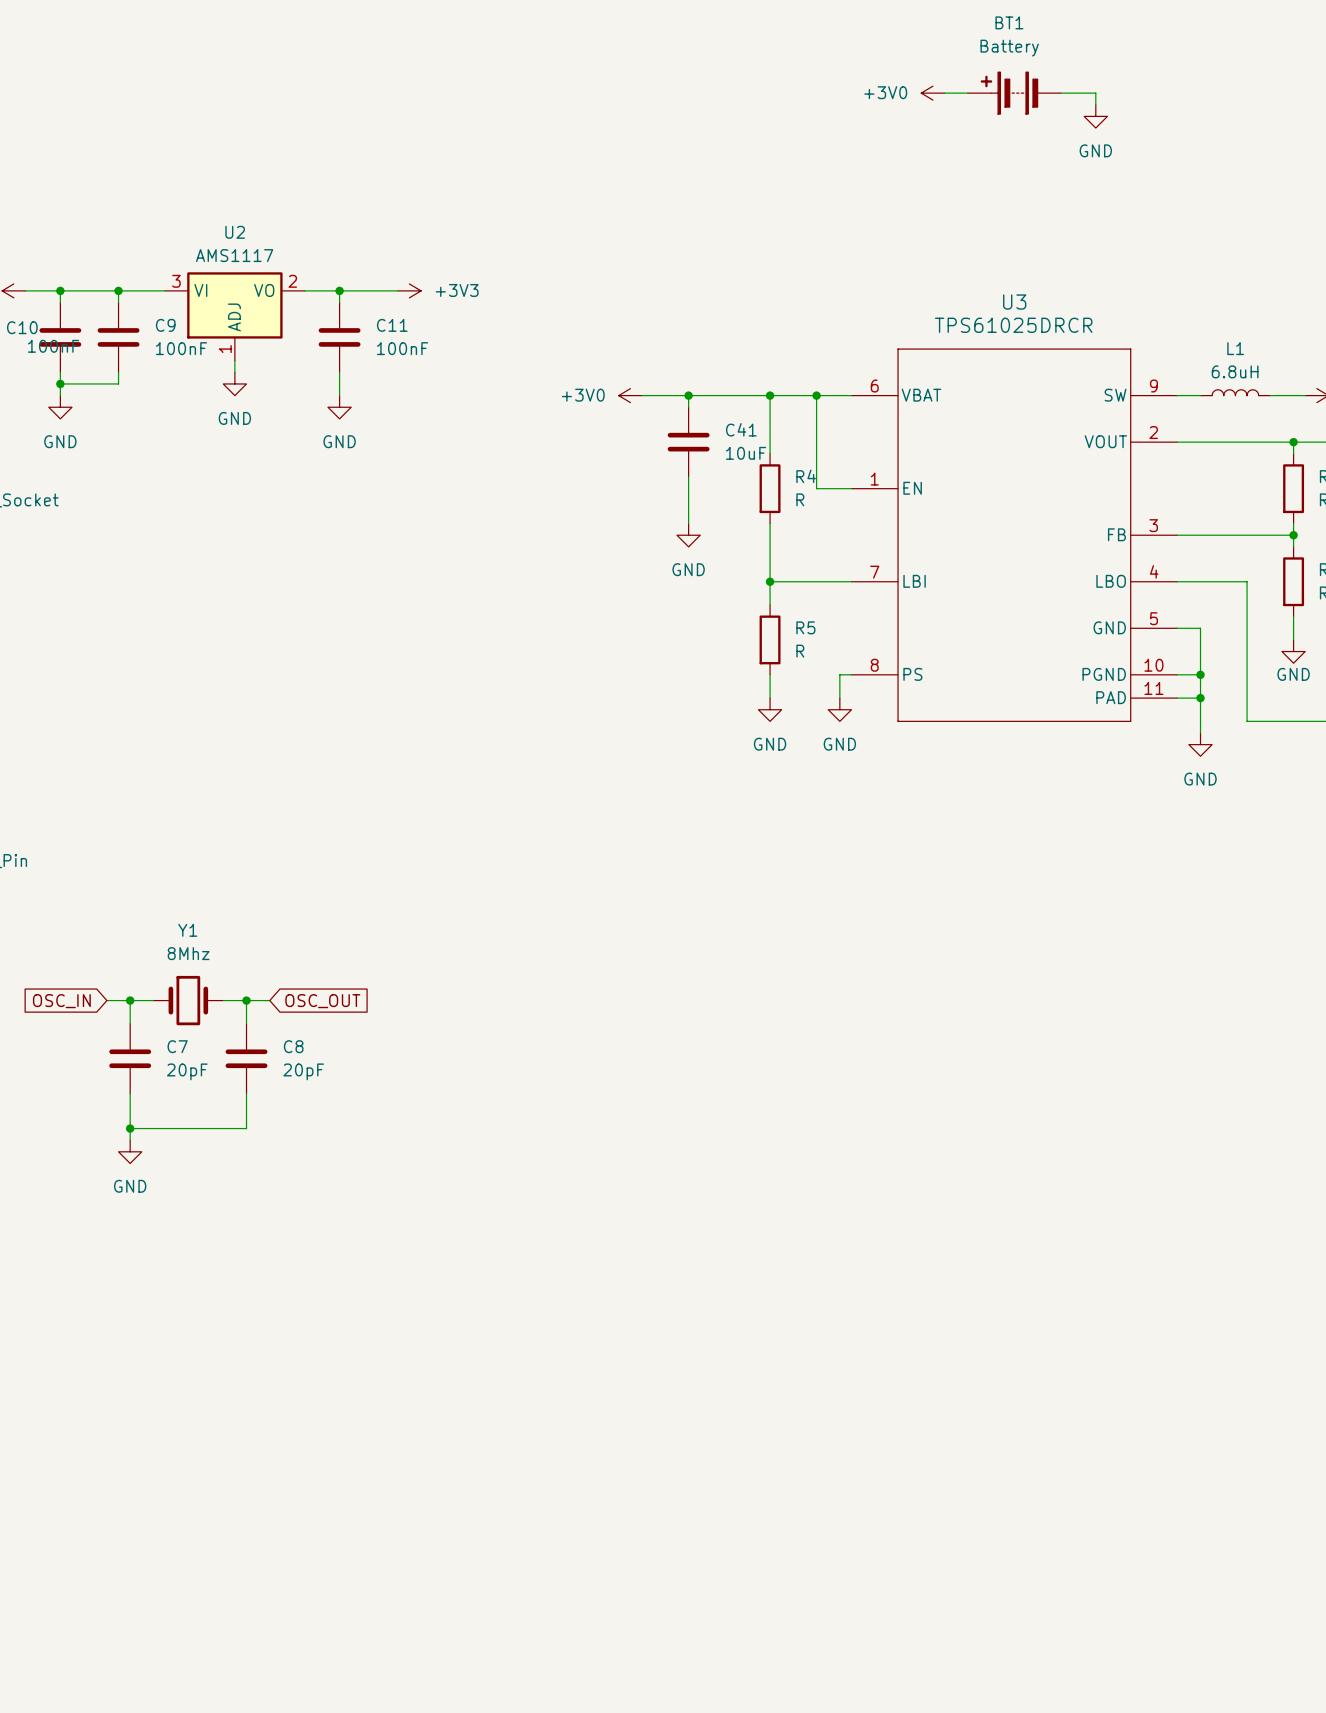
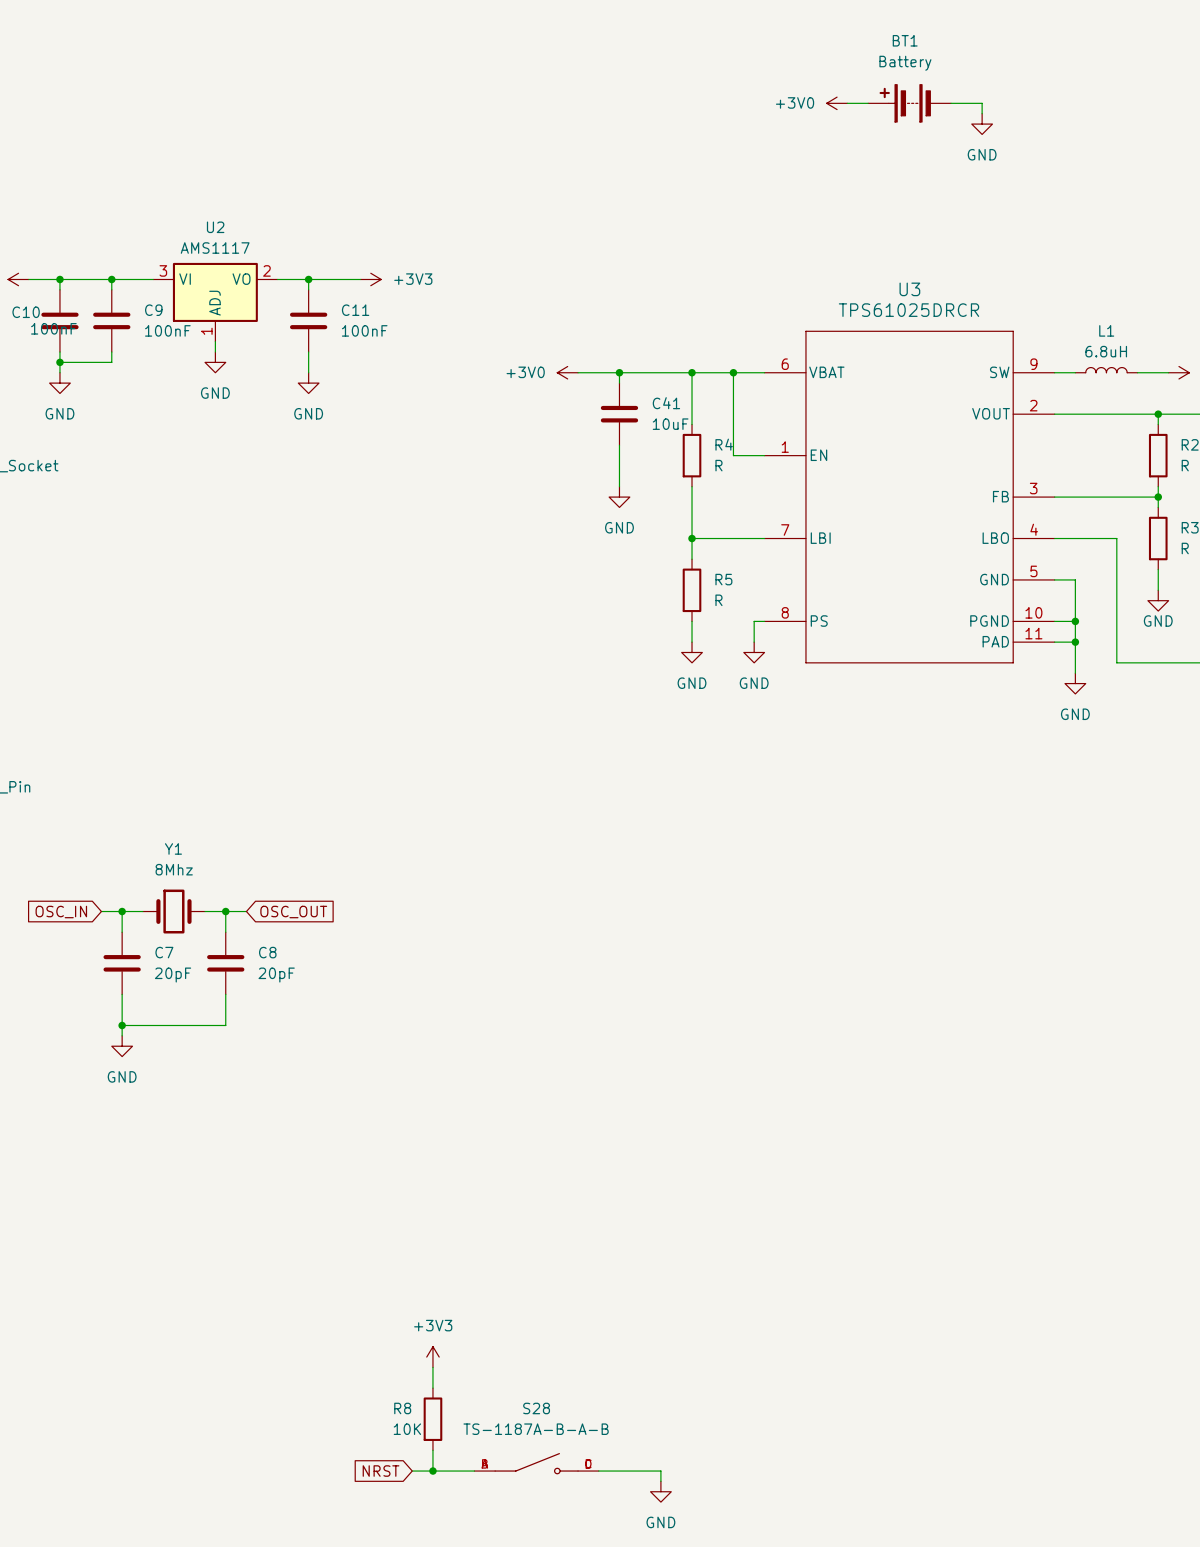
power symbol: none -> +3V3 (432, 1357)
wire: none -> (432, 1367) (432, 1388)
R8: none -> 10K (432, 1419)
wire: none -> (432, 1450) (432, 1471)
S28: none -> TS-1187A-B-A-B (536, 1463)
global label: none -> NRST (381, 1471)
wire: none -> (412, 1471) (474, 1471)
junction: none -> (432, 1471)
wire: none -> (598, 1471) (660, 1471) (660, 1481)
power symbol: none -> GND (660, 1491)

